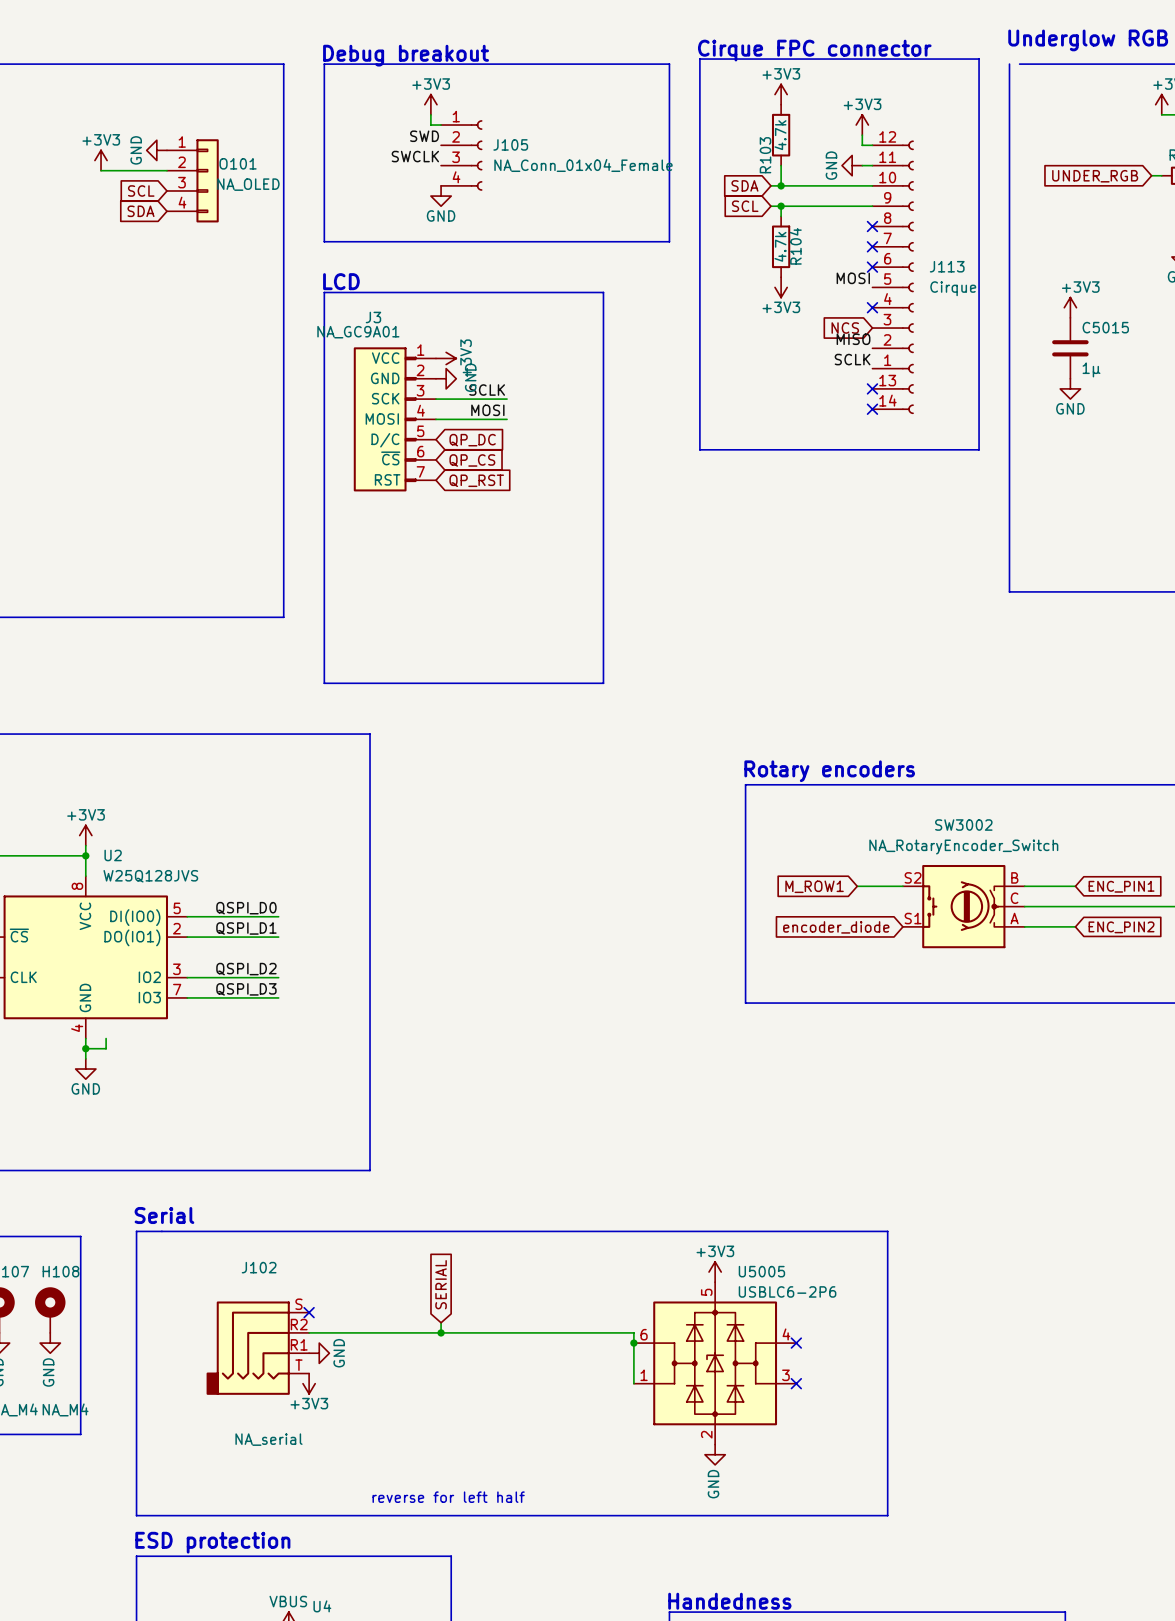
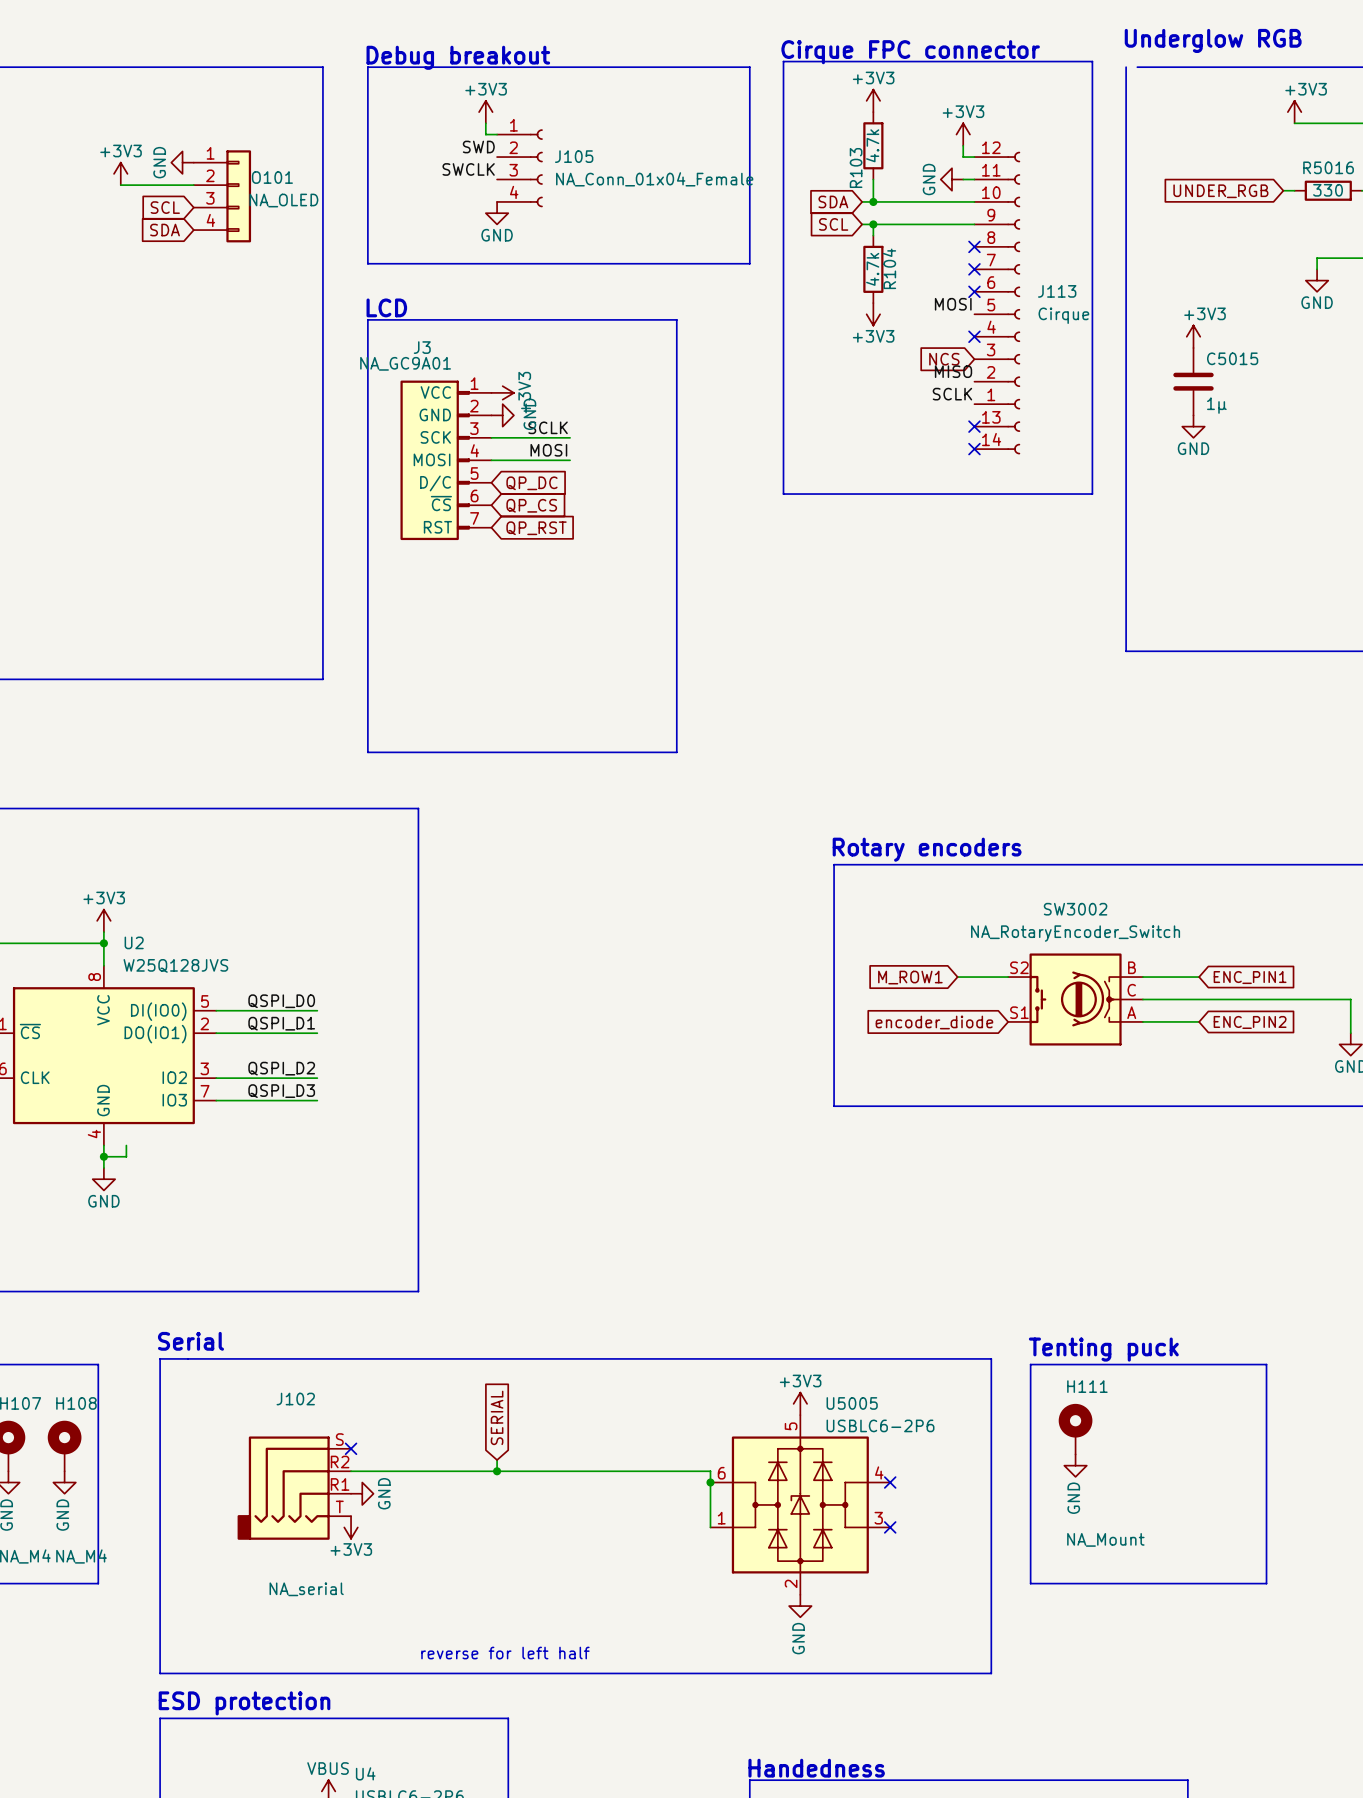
text: none -> Tenting puck (1103, 1349)
line: none -> (1030, 1364) (1030, 1583) (1266, 1583) (1266, 1364) (1030, 1364)
H111: none -> NA_Mount (1075, 1429)
power symbol: none -> GND (1075, 1465)

